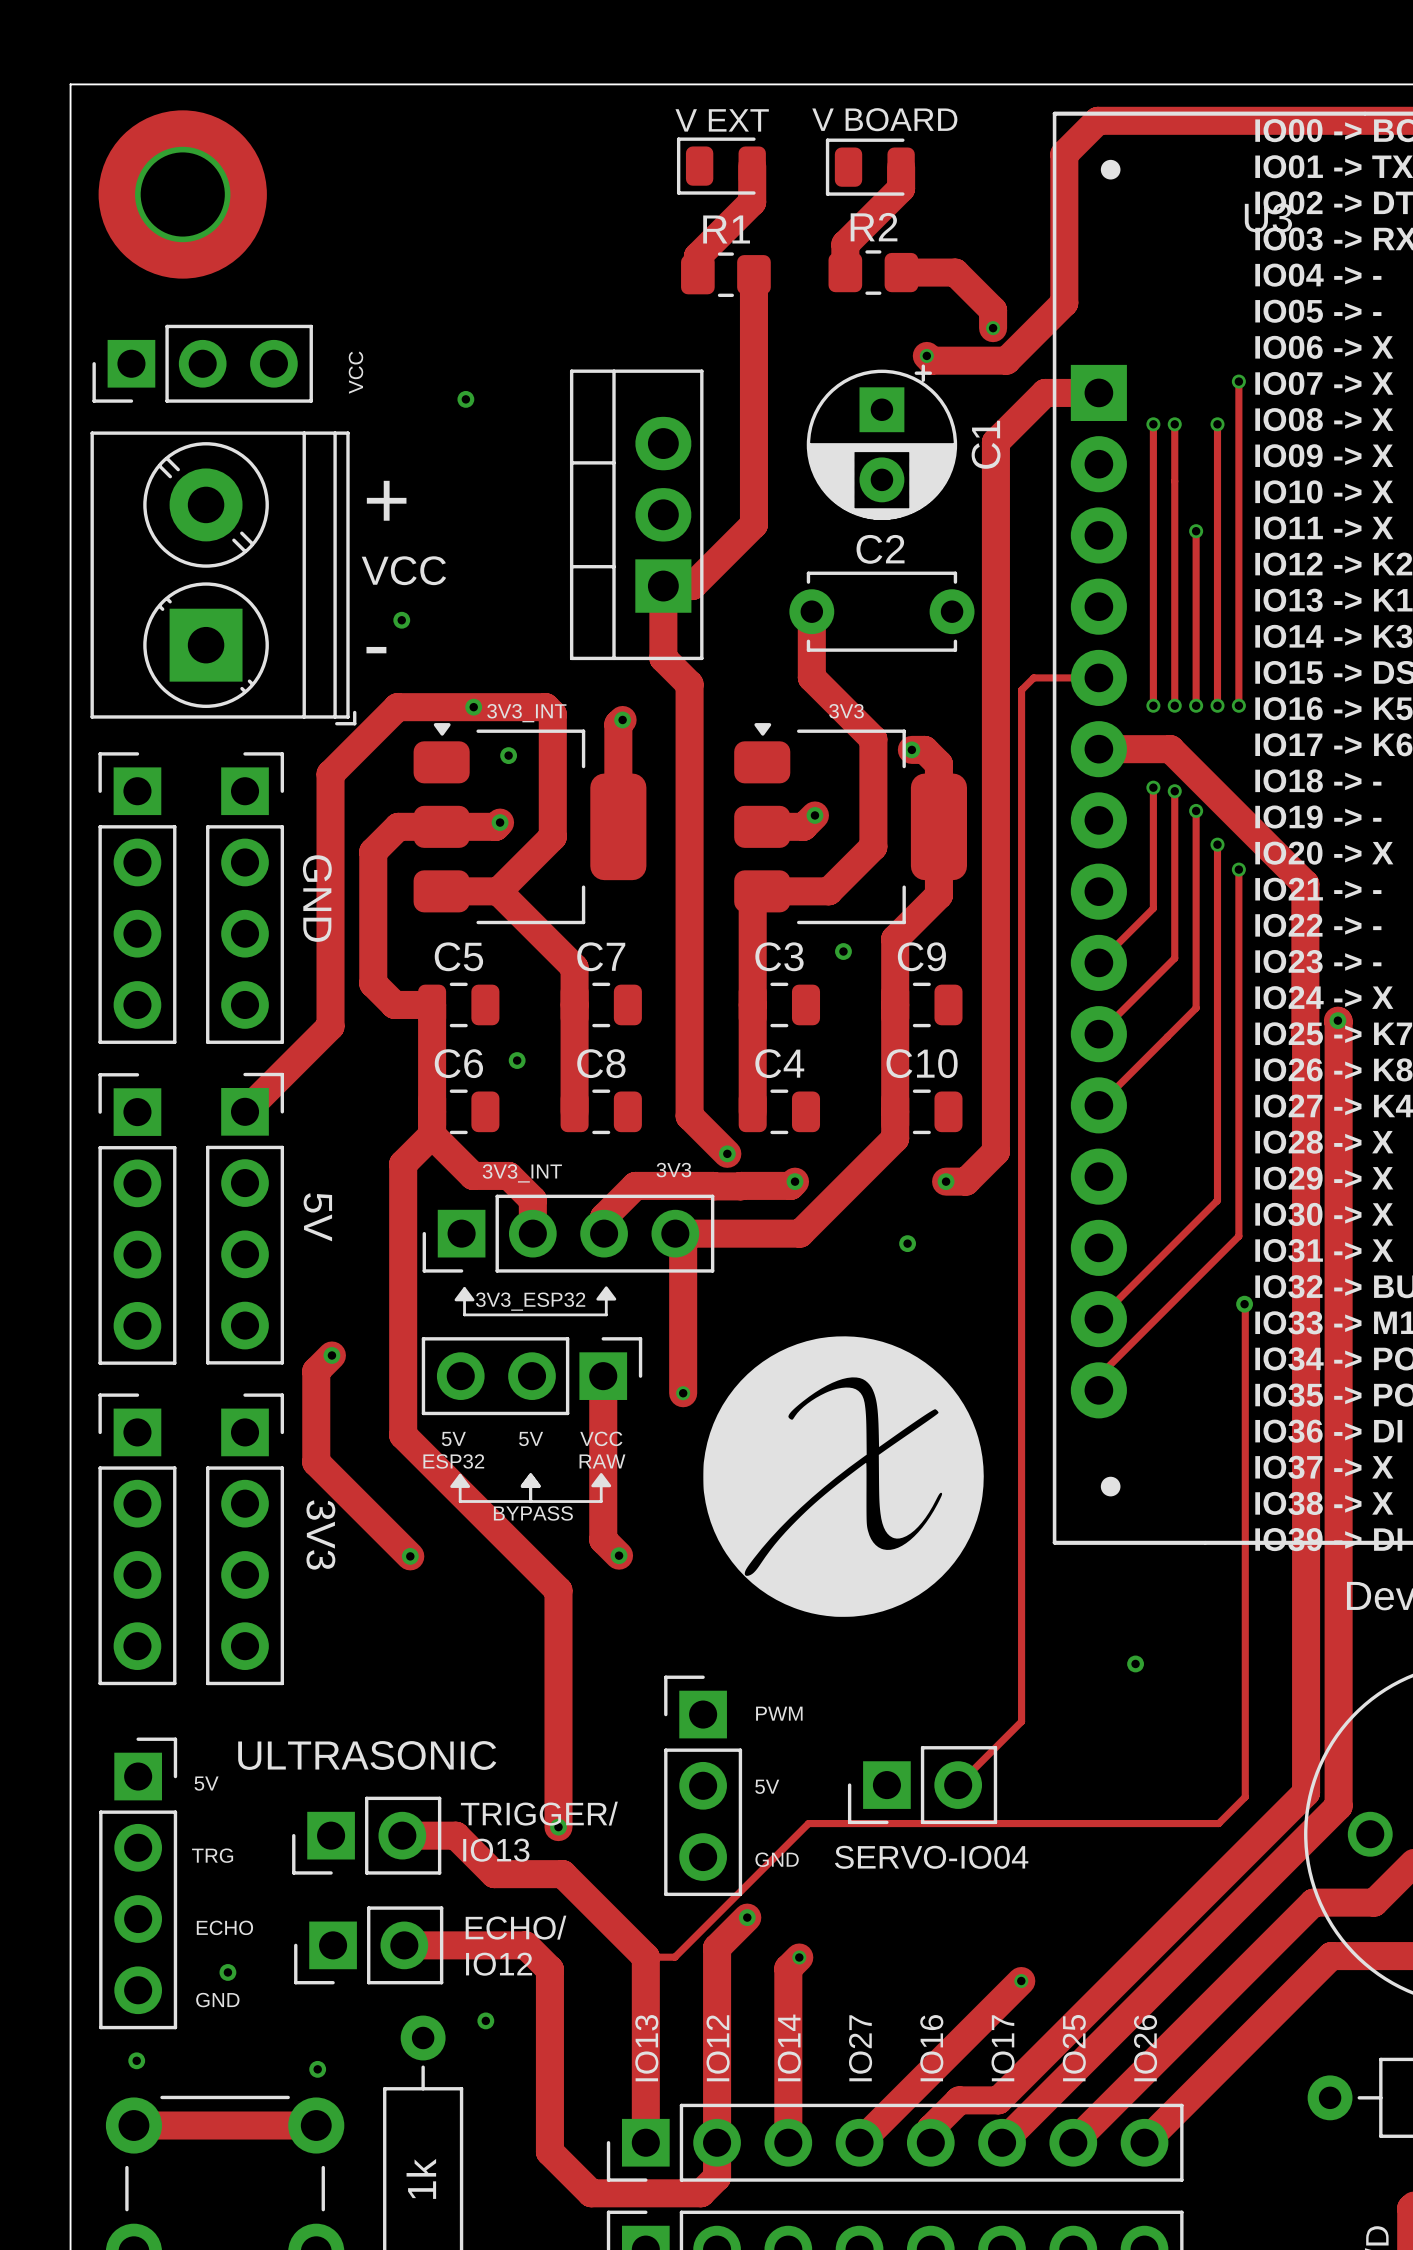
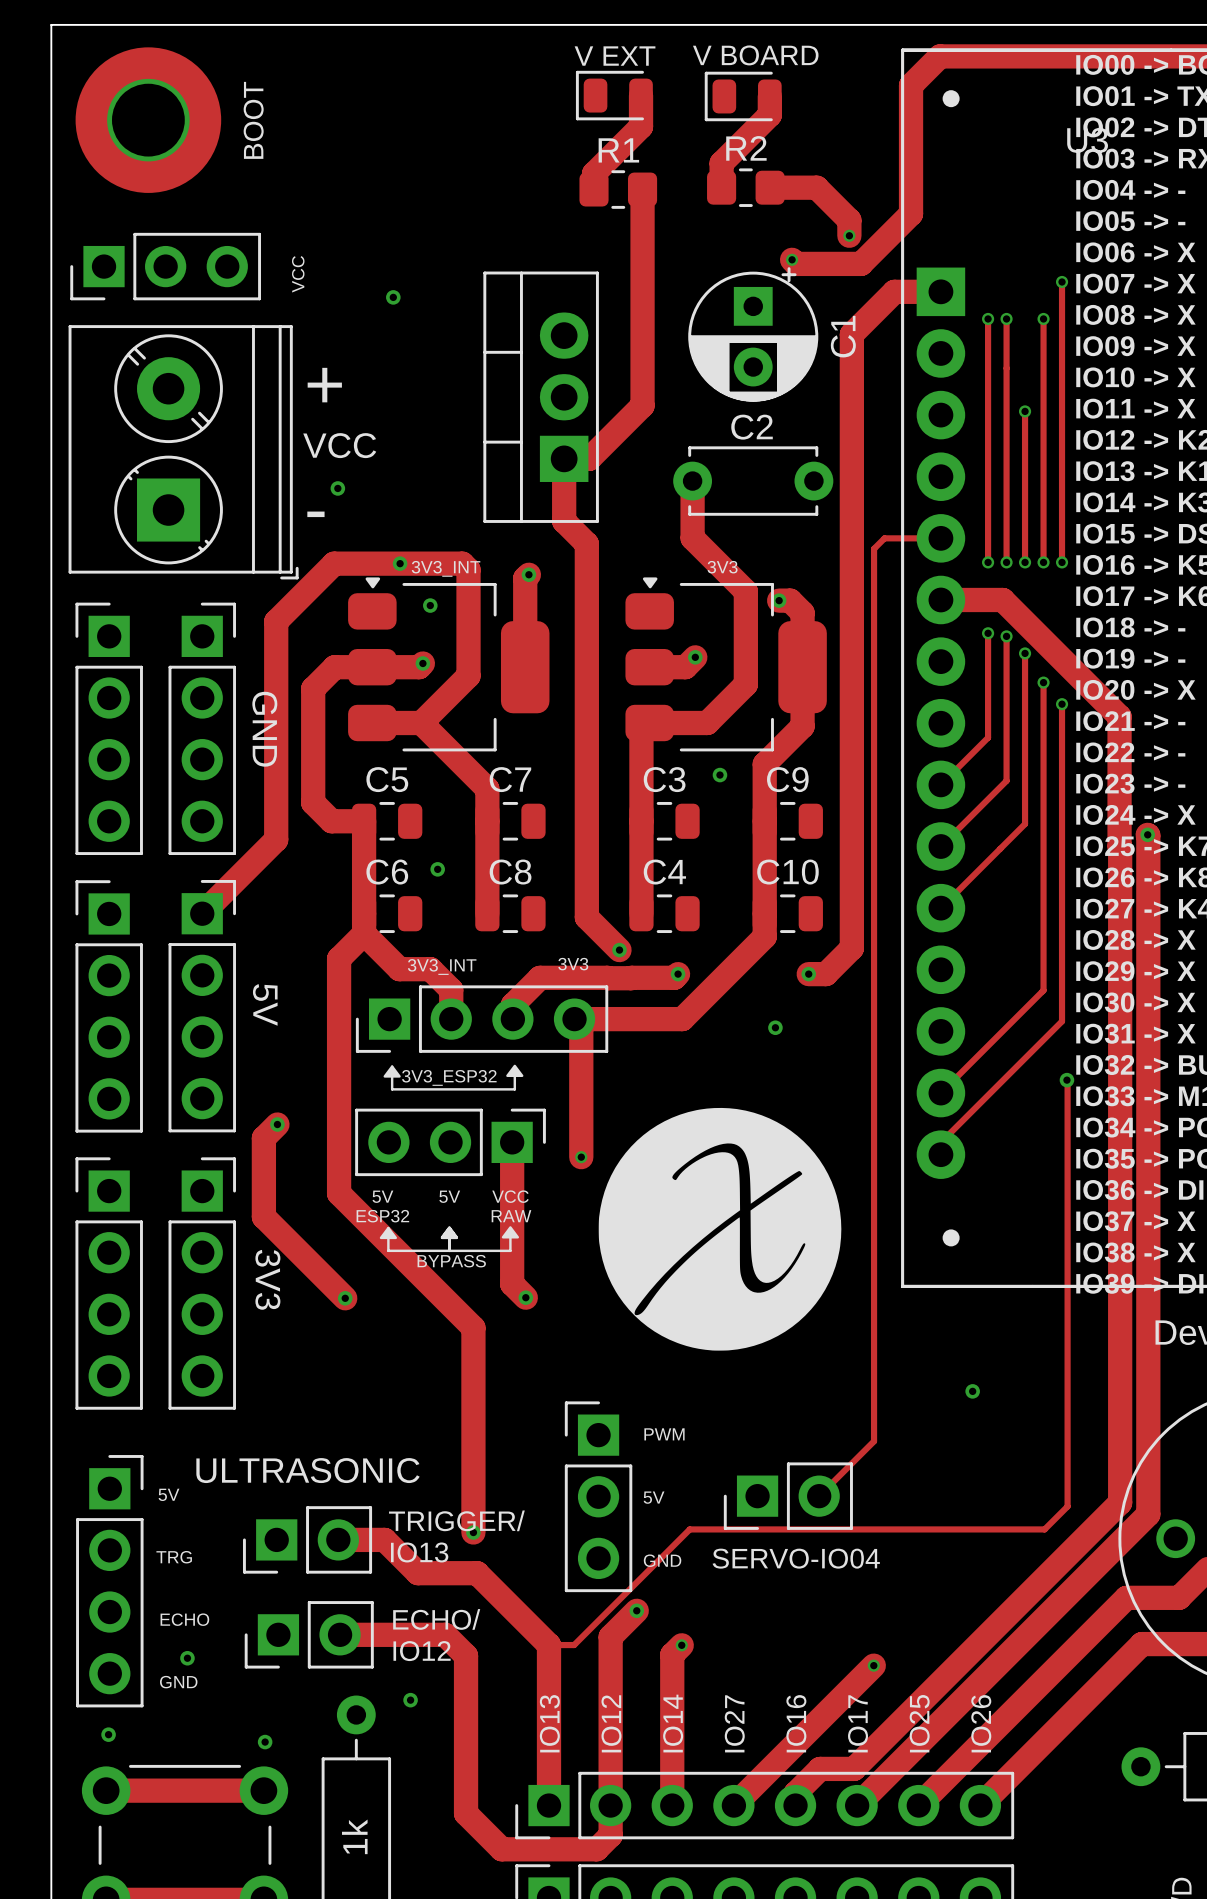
text: none -> BOOT (253, 120)

